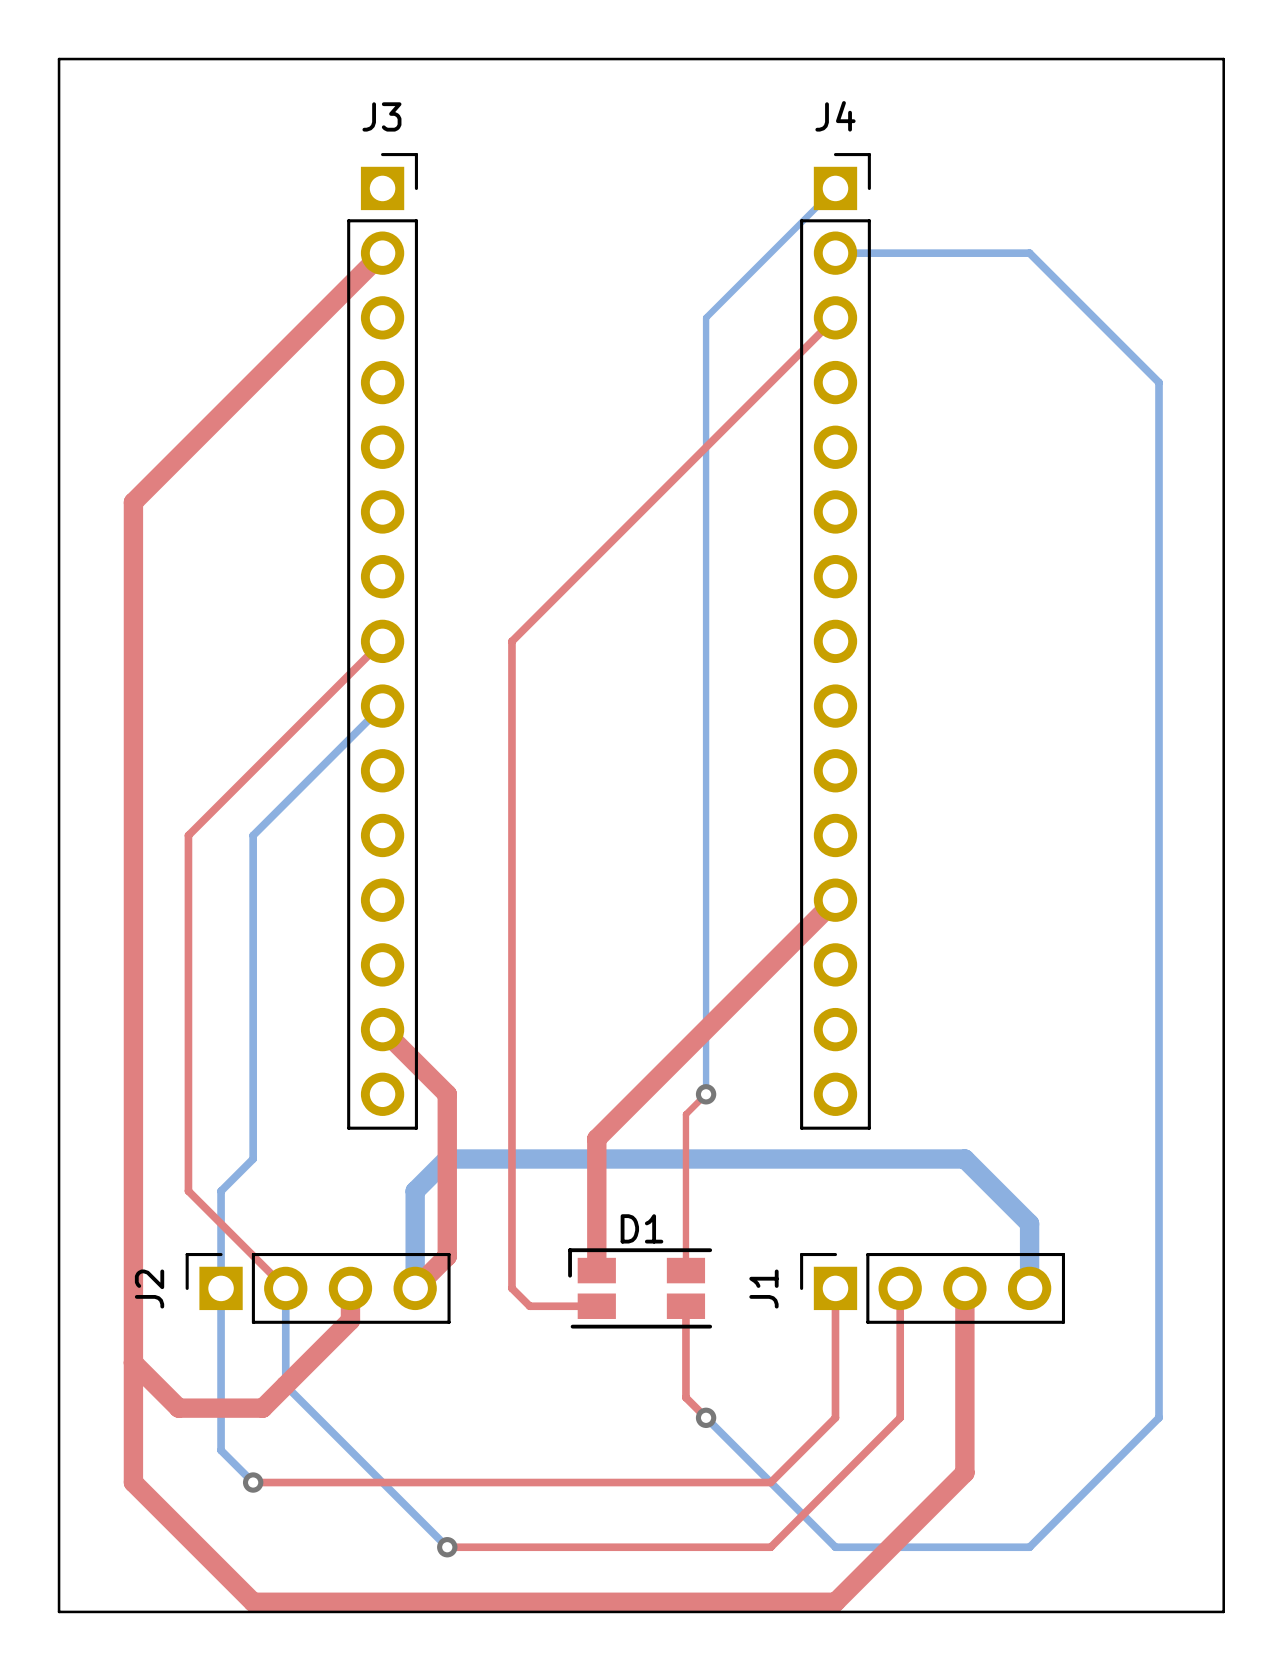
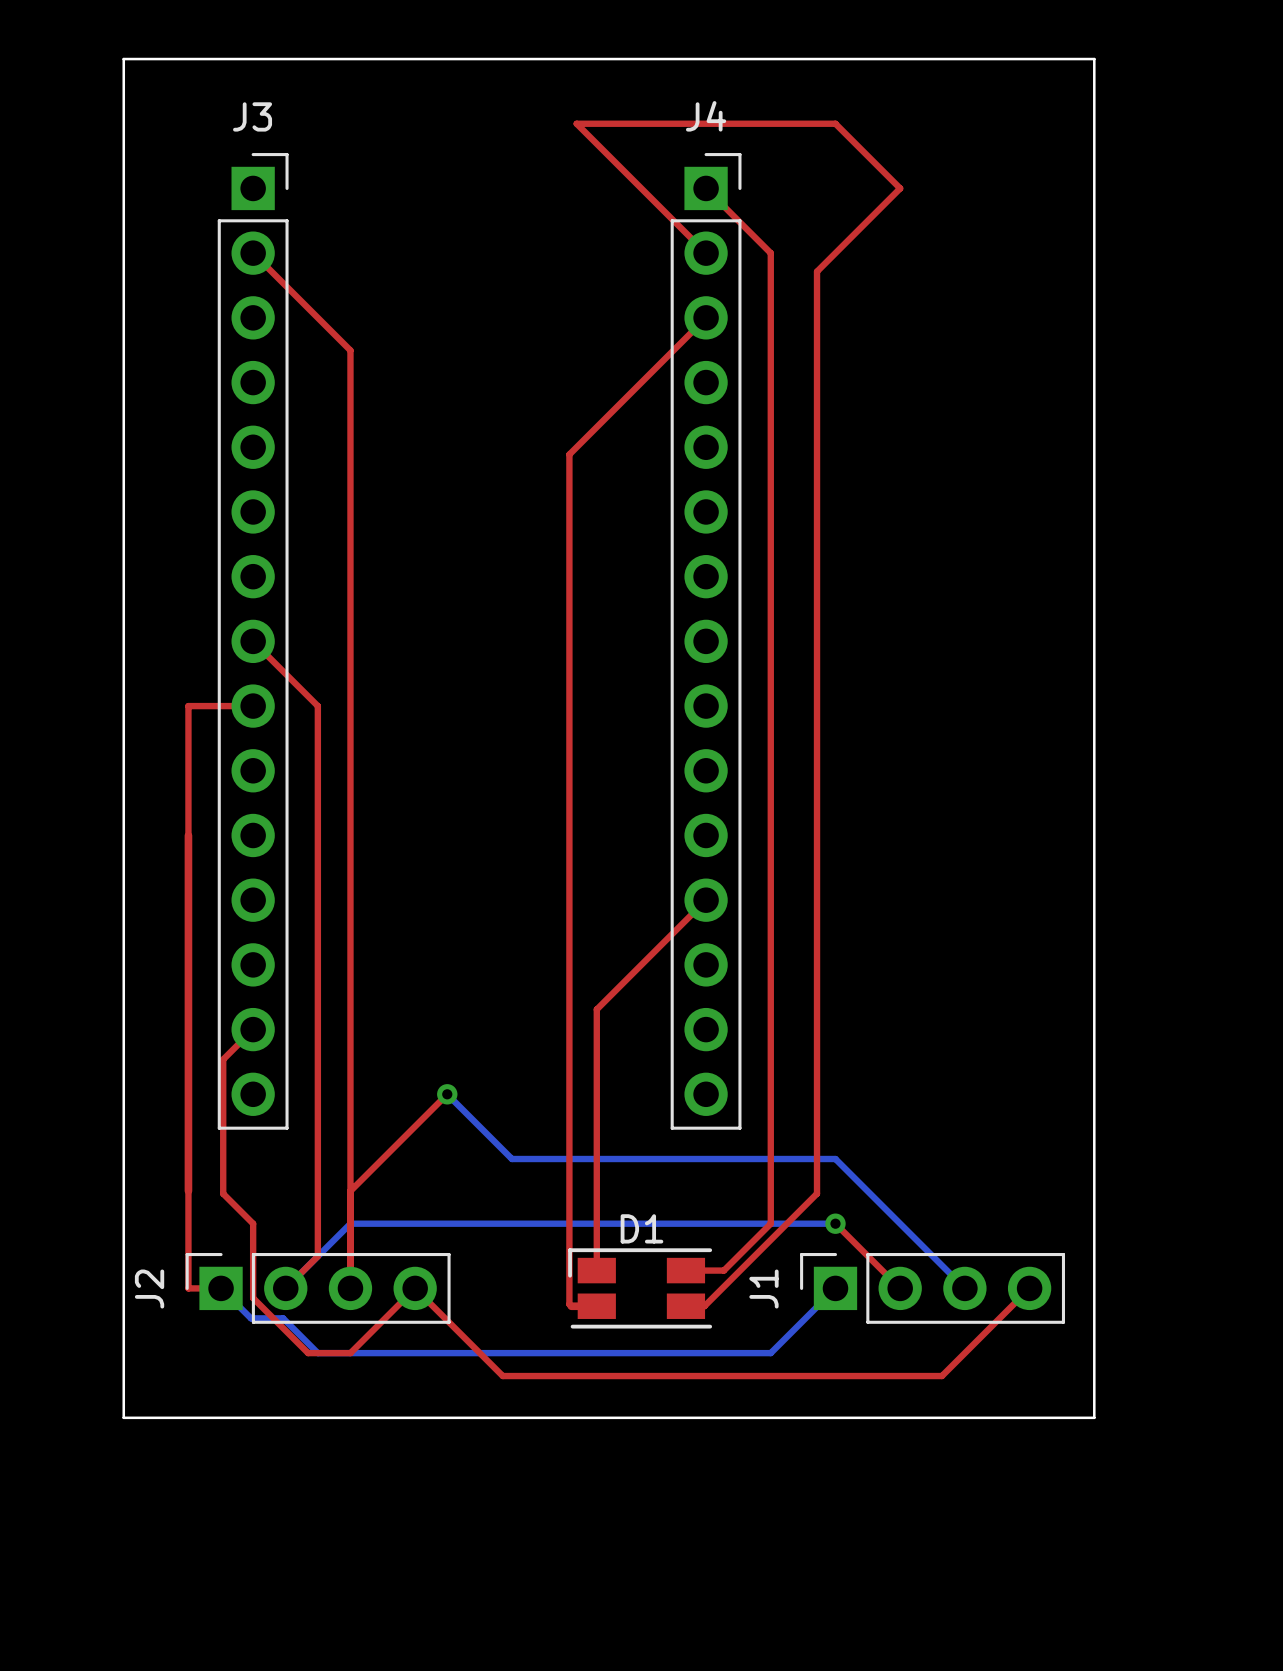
board edge: (123, 59) (59, 59) (59, 1611) (1223, 1611) (1223, 59) (1094, 59) -> (123, 59) (123, 1417) (1094, 1417) (1094, 59)
bottom track: (835, 188) (706, 317) (706, 1094) -> none
top track: (382, 253) (133, 502) (133, 1482) (253, 1602) (835, 1602) (964, 1472) (964, 1288) -> none
bottom track: (835, 253) (1029, 253) (1159, 382) (1159, 1417) (1029, 1547) (835, 1547) (706, 1417) -> none
top track: (835, 317) (511, 641) (511, 1288) (529, 1306) (571, 1306) -> (706, 317) (569, 454) (569, 1304) (571, 1306)
top track: none -> (253, 641) (317, 706) (317, 1256) (285, 1288)
top track: (382, 641) (188, 835) -> (253, 706) (188, 706) (188, 835)
J3 position: (382, 641) -> (253, 641)
J4 position: (835, 641) -> (706, 641)
bottom track: (382, 706) (253, 835) (253, 1159) (221, 1191) (221, 1450) (253, 1482) -> none
top track: (835, 900) (596, 1138) -> (706, 900) (596, 1009) (596, 1138)
top track: none -> (253, 1029) (223, 1059) (223, 1193) (253, 1223) (253, 1298) (308, 1353) (350, 1353) (415, 1288) (502, 1376) (941, 1376) (1029, 1288)
top track: (382, 1029) (447, 1094) (447, 1256) (415, 1288) -> none
top track: none -> (447, 1094) (350, 1191)
via: none -> (447, 1094)
top track: (706, 1094) (685, 1114) (685, 1270) -> (706, 188) (770, 253) (770, 1223) (723, 1270) (685, 1270)
via: (706, 1094) -> none
top track width: thick (596, 1138) (596, 1270) -> thin (596, 1138) (596, 1270)
bottom track: (511, 1159) (447, 1159) (415, 1191) (415, 1288) -> (511, 1159) (447, 1094)
bottom track width: thick (511, 1159) (835, 1159) -> thin (511, 1159) (835, 1159)
bottom track: (835, 1159) (964, 1159) (1029, 1223) (1029, 1288) -> (835, 1159) (964, 1288)
top track: (188, 1191) (285, 1288) -> (188, 1191) (188, 1288) (221, 1288)
via: none -> (835, 1223)
bottom track: none -> (221, 1288) (250, 1318) (283, 1318) (317, 1353) (770, 1353) (835, 1288)
bottom track: (285, 1288) (285, 1385) (447, 1547) -> (285, 1288) (350, 1223) (835, 1223)
top track: (350, 1288) (350, 1320) (262, 1408) (178, 1408) (133, 1362) -> (350, 1288) (350, 350) (253, 253)
top track: (835, 1288) (835, 1417) (770, 1482) (253, 1482) -> none
top track: (900, 1288) (900, 1417) (770, 1547) (447, 1547) -> (900, 1288) (835, 1223)
top track: (685, 1306) (685, 1397) (706, 1417) -> (685, 1306) (704, 1306) (817, 1193) (817, 271) (900, 188) (835, 123) (576, 123) (706, 253)
via: (706, 1417) -> none
via: (253, 1482) -> none
via: (447, 1547) -> none

